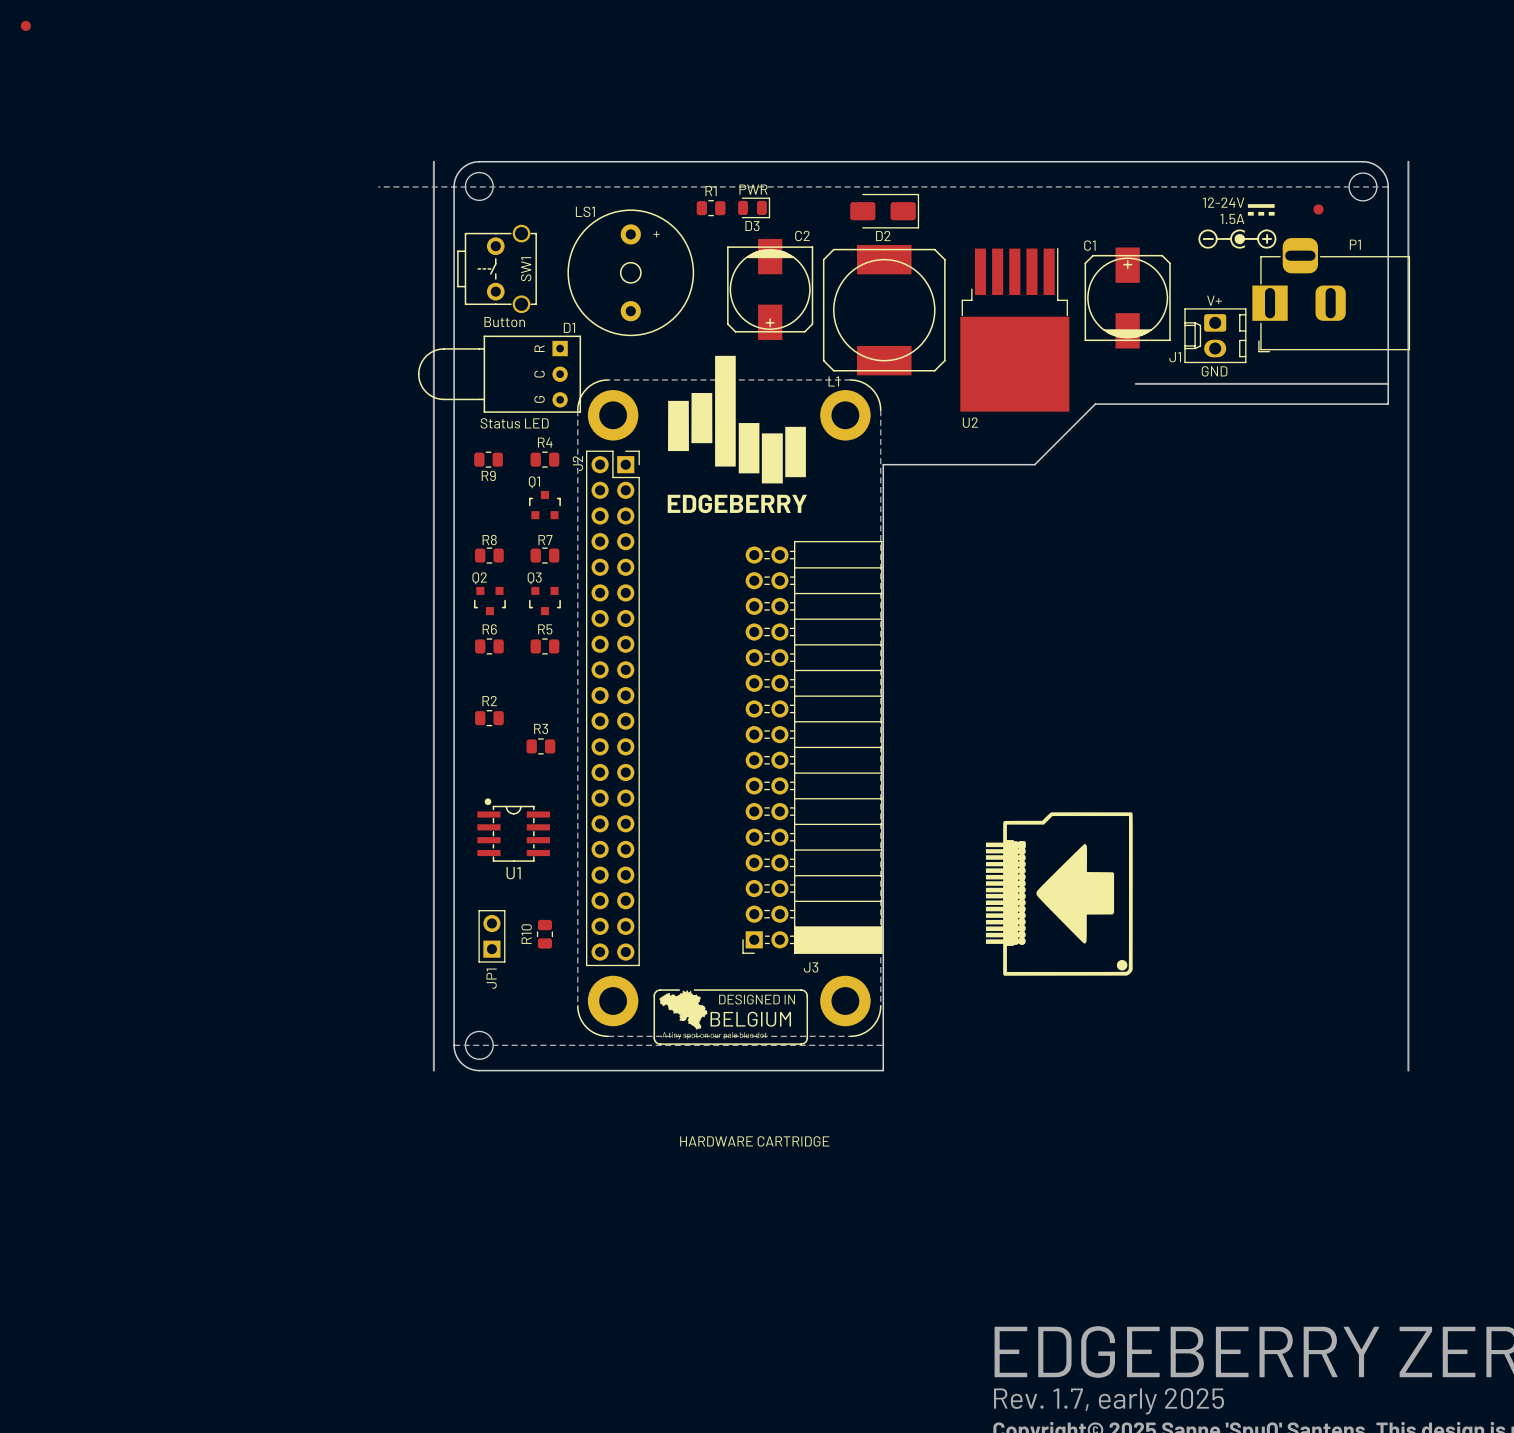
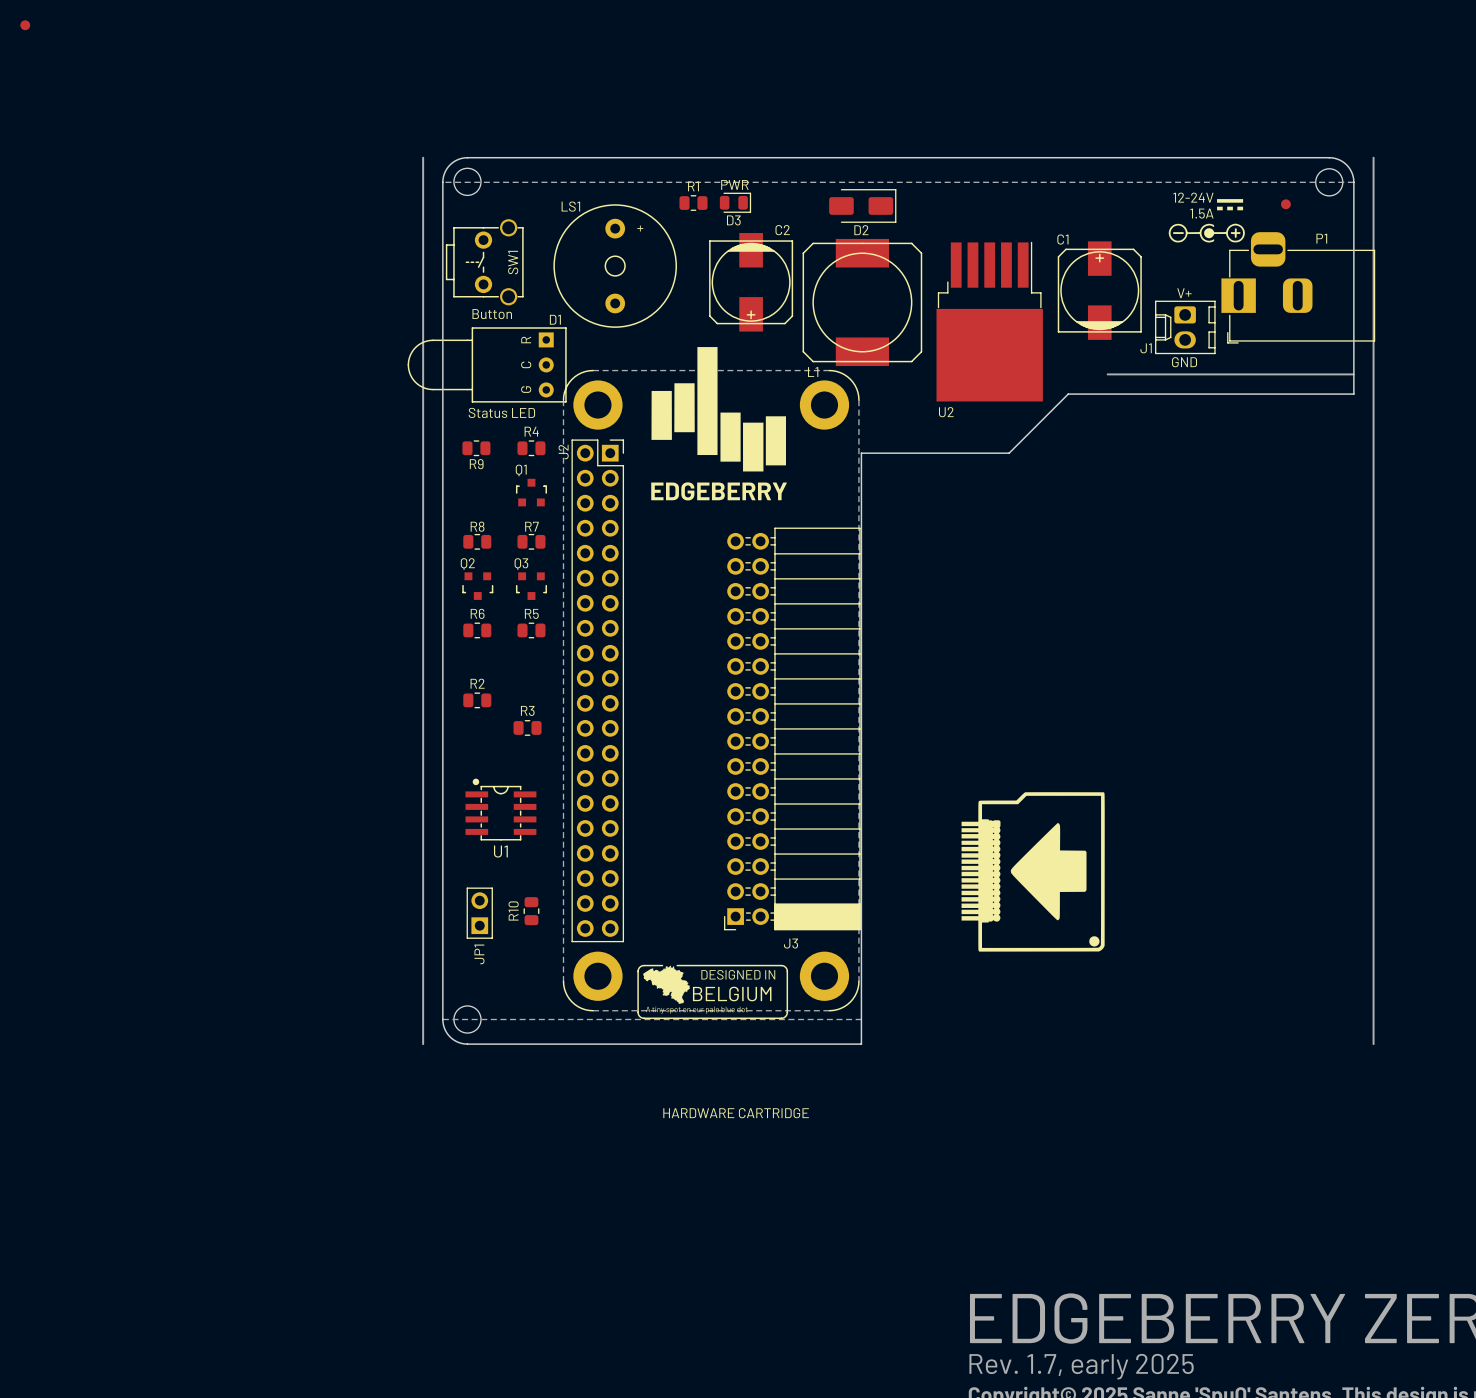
line: (378, 186) (454, 186) -> none

